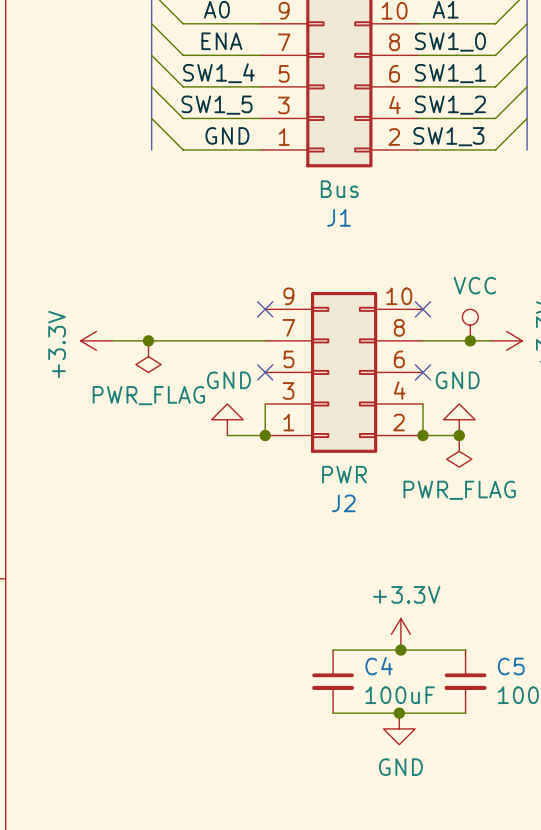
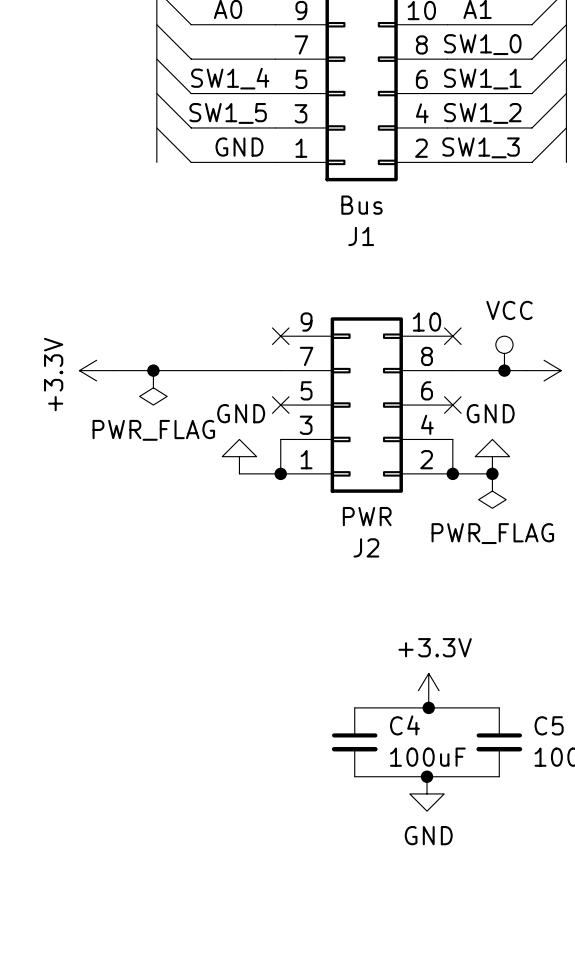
label: ENA (221, 41) -> none

